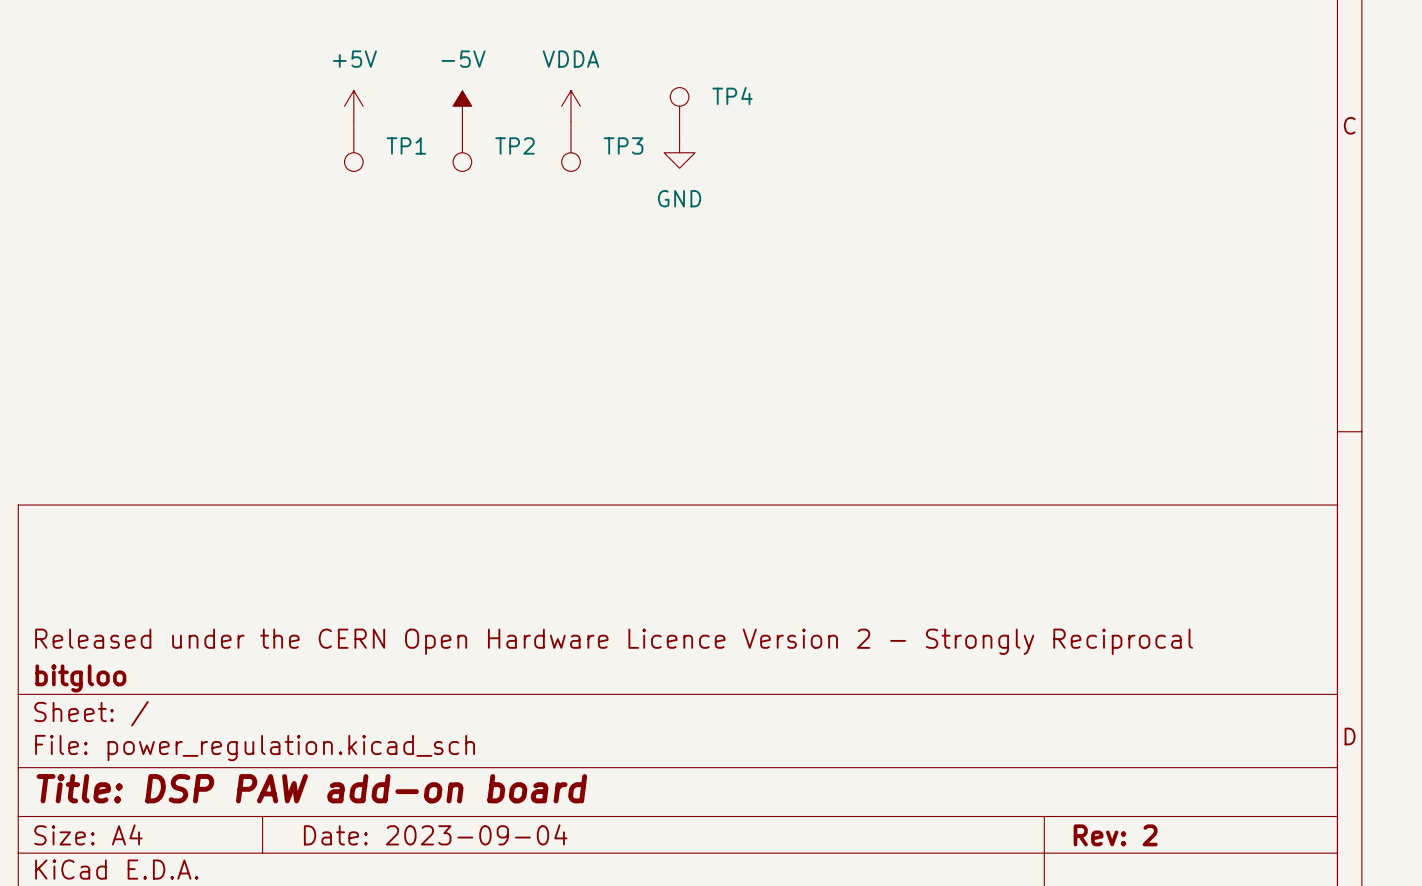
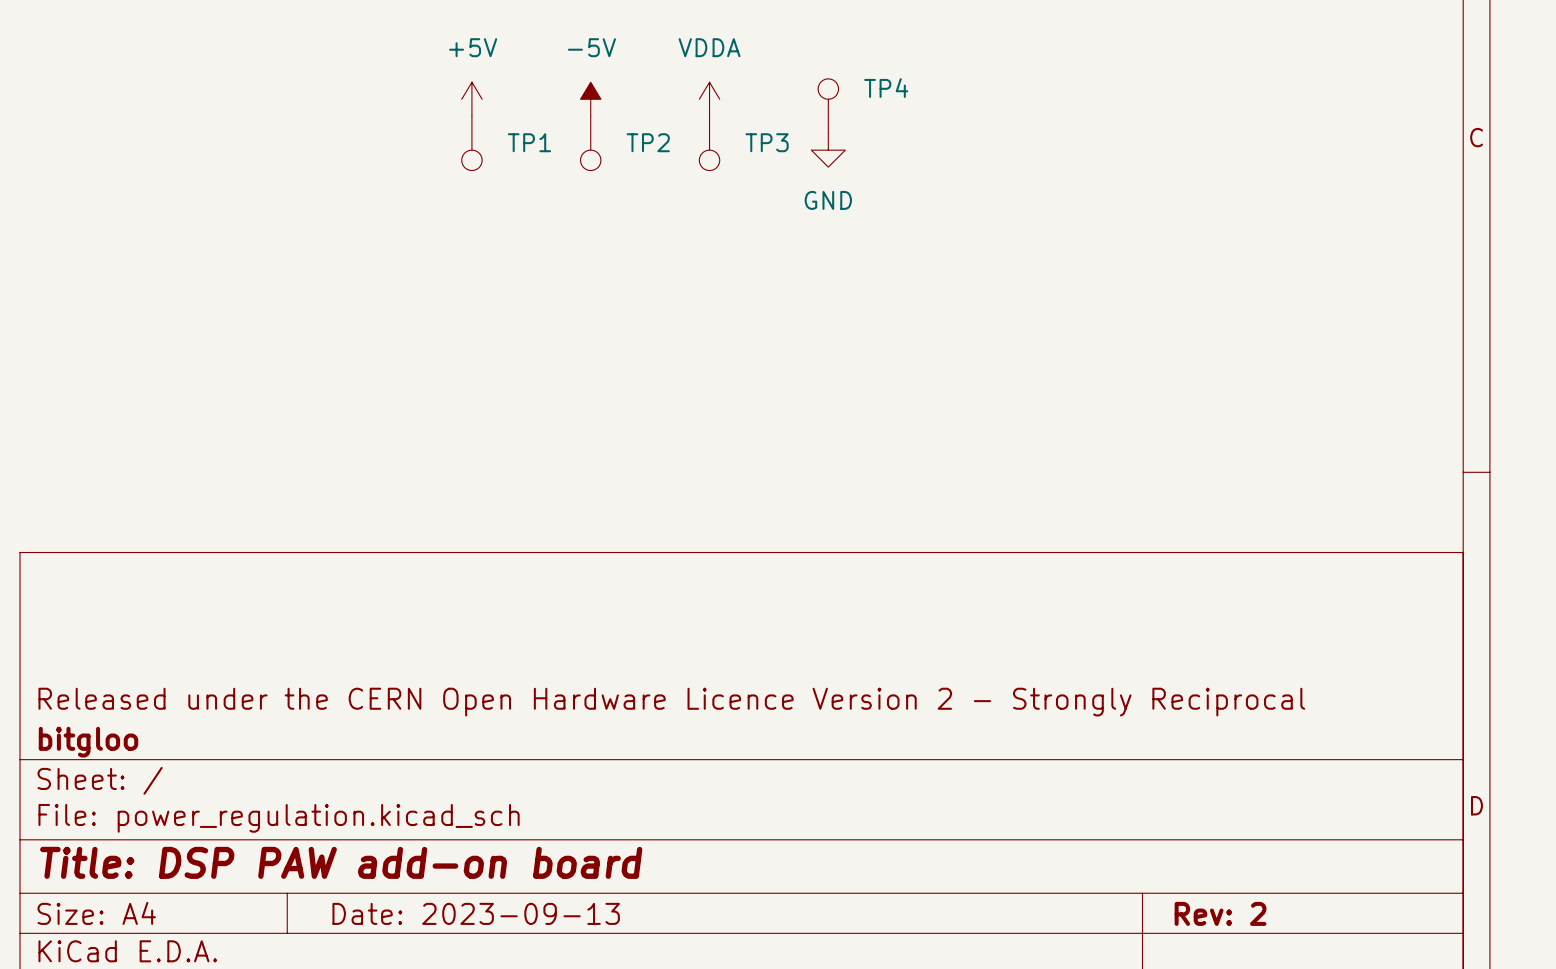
power symbol position: +5V (353, 106) -> +5V (471, 99)
power symbol position: -5V (462, 106) -> -5V (590, 99)
power symbol position: VDDA (571, 106) -> VDDA (709, 99)
TP4 position: (679, 112) -> (828, 106)
TP1 position: (353, 146) -> (471, 143)
TP2 position: (462, 146) -> (590, 143)
TP3 position: (571, 146) -> (709, 143)
power symbol position: GND (679, 152) -> GND (828, 150)
title block: Date: 2023-09-04 (435, 834) -> Date: 2023-09-13 (476, 913)

